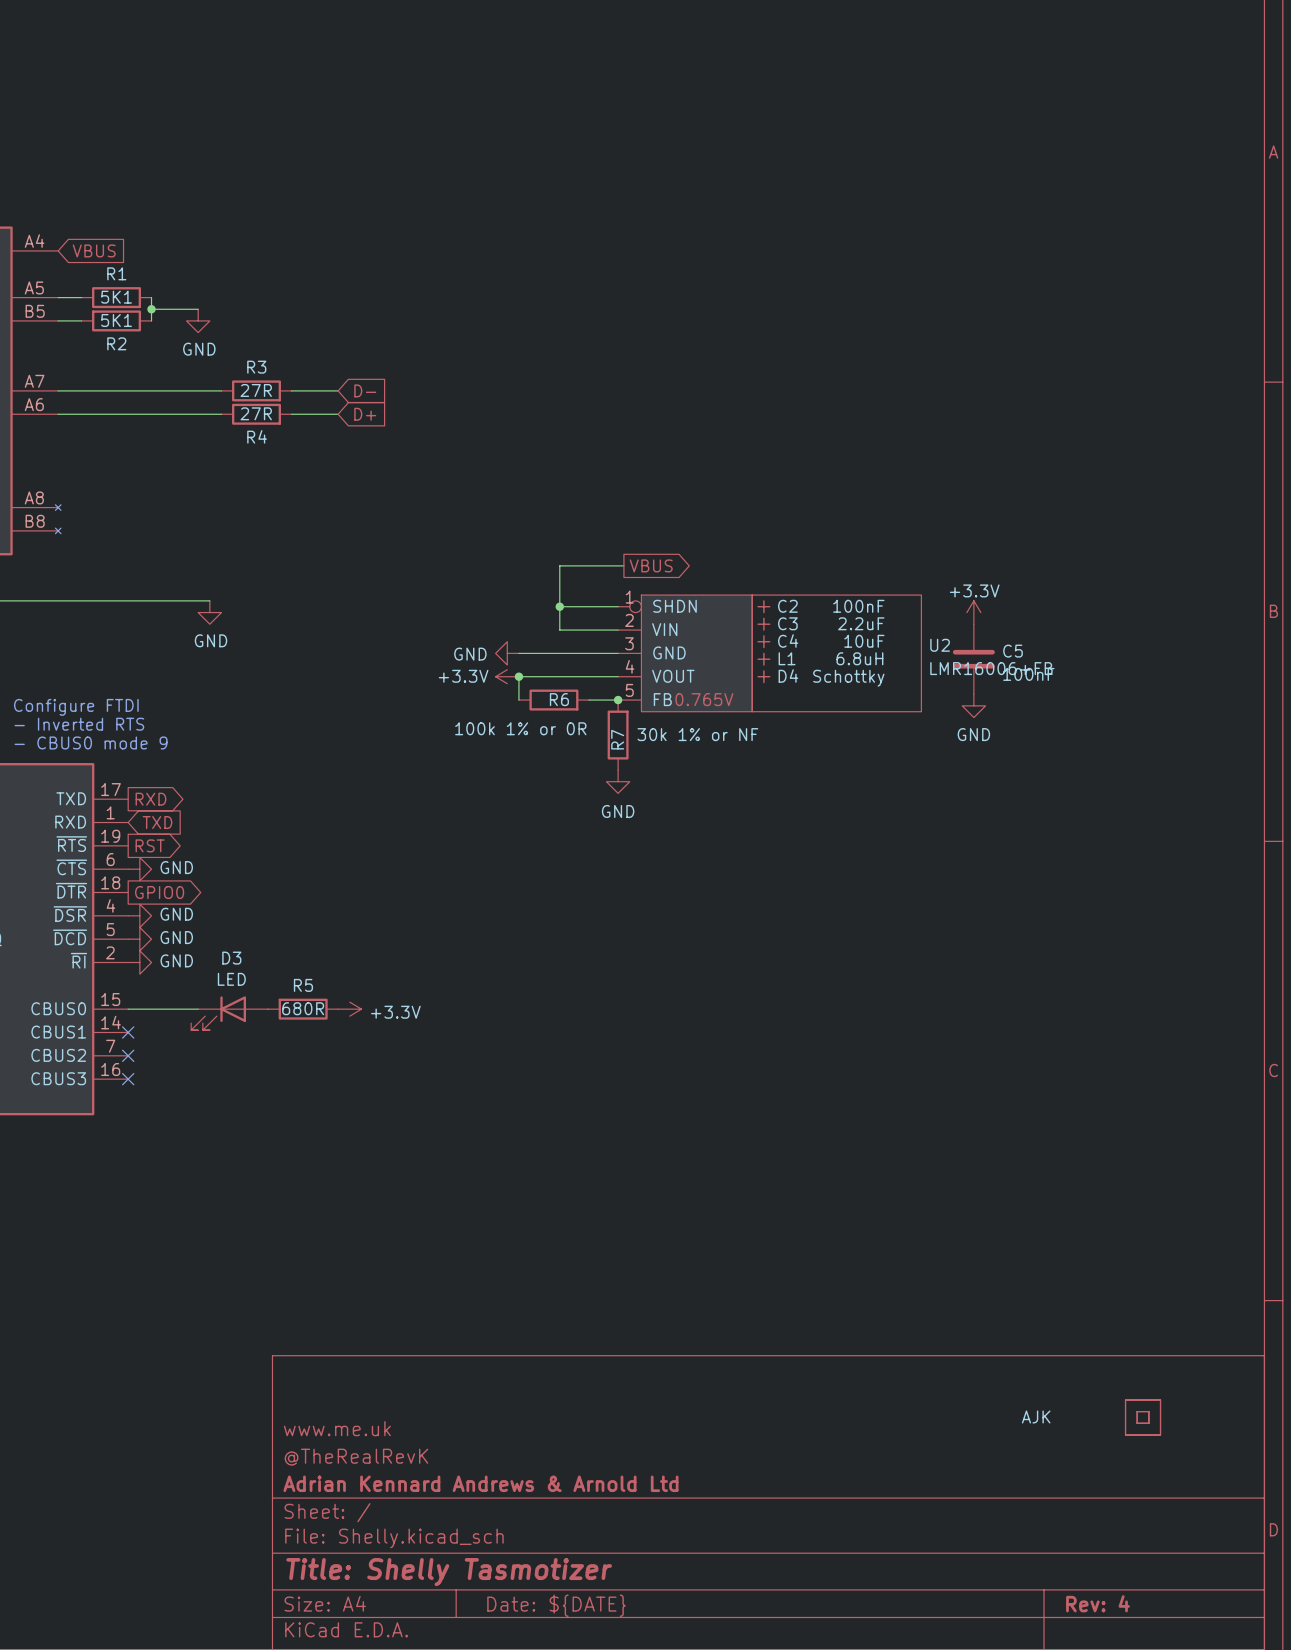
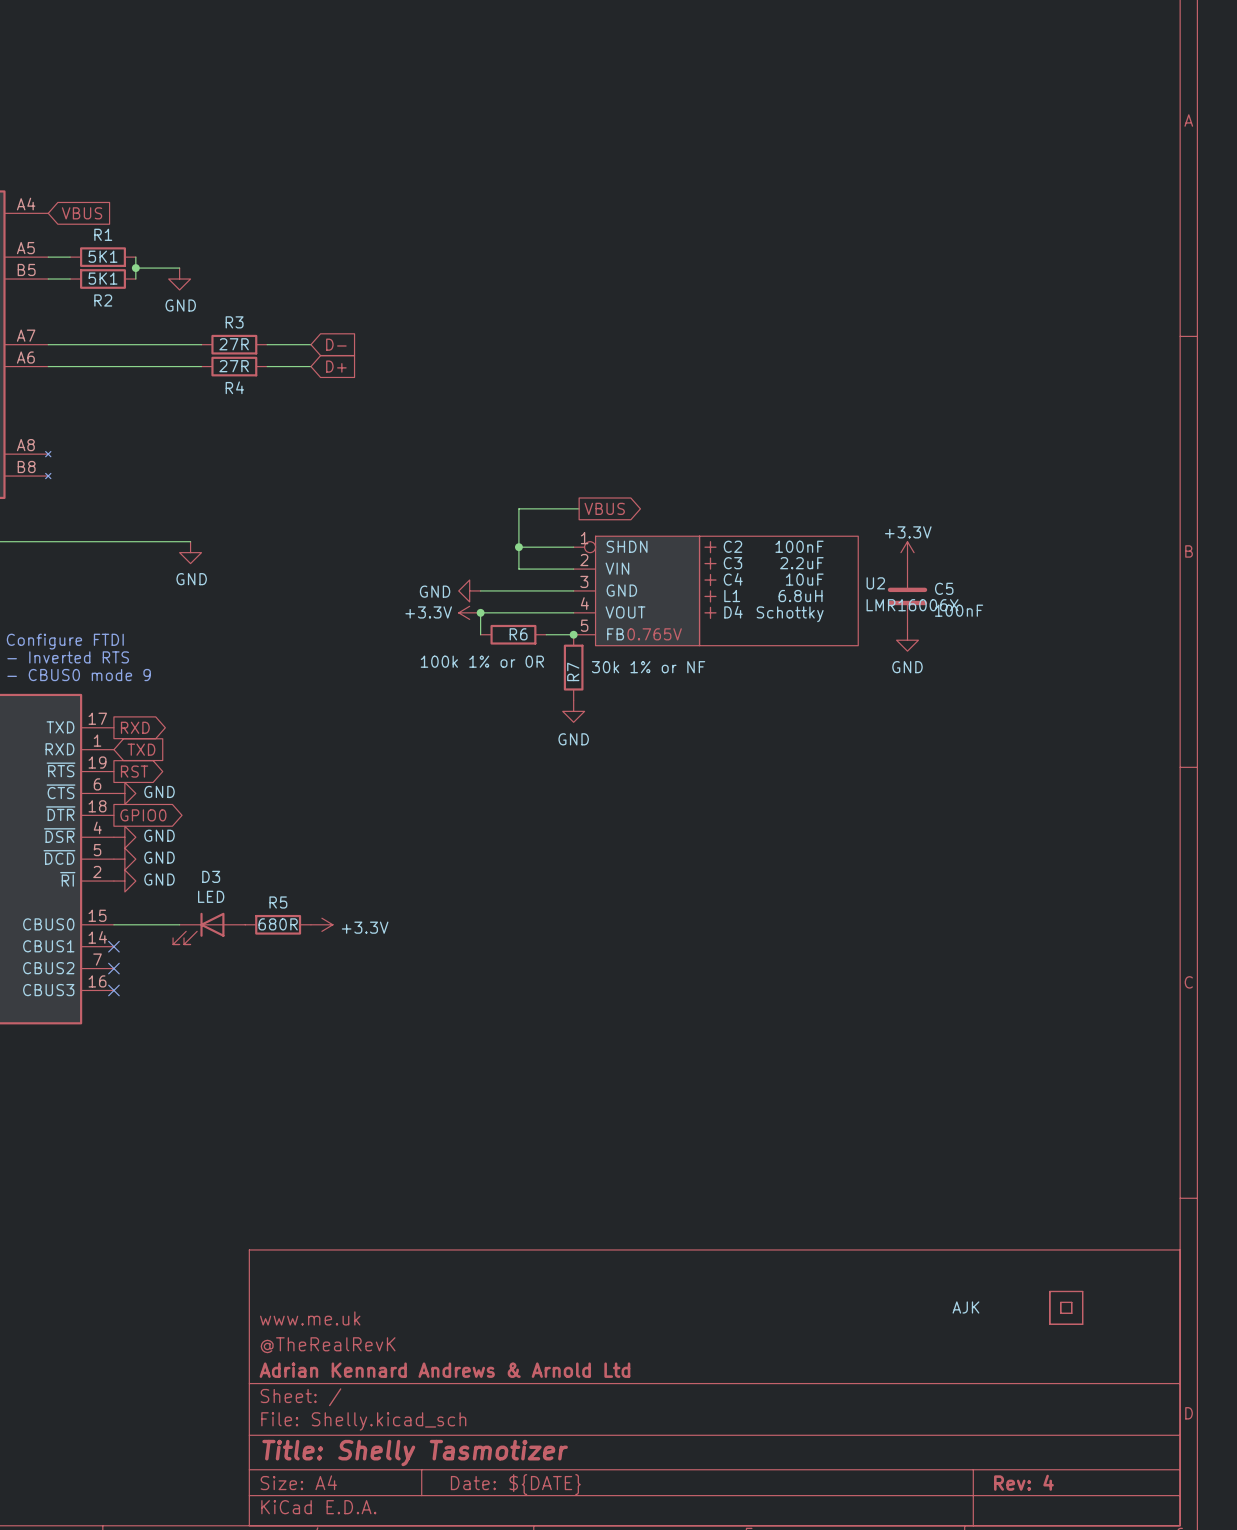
U2 value: LMR16006+FB (991, 668) -> LMR16006X (912, 605)

